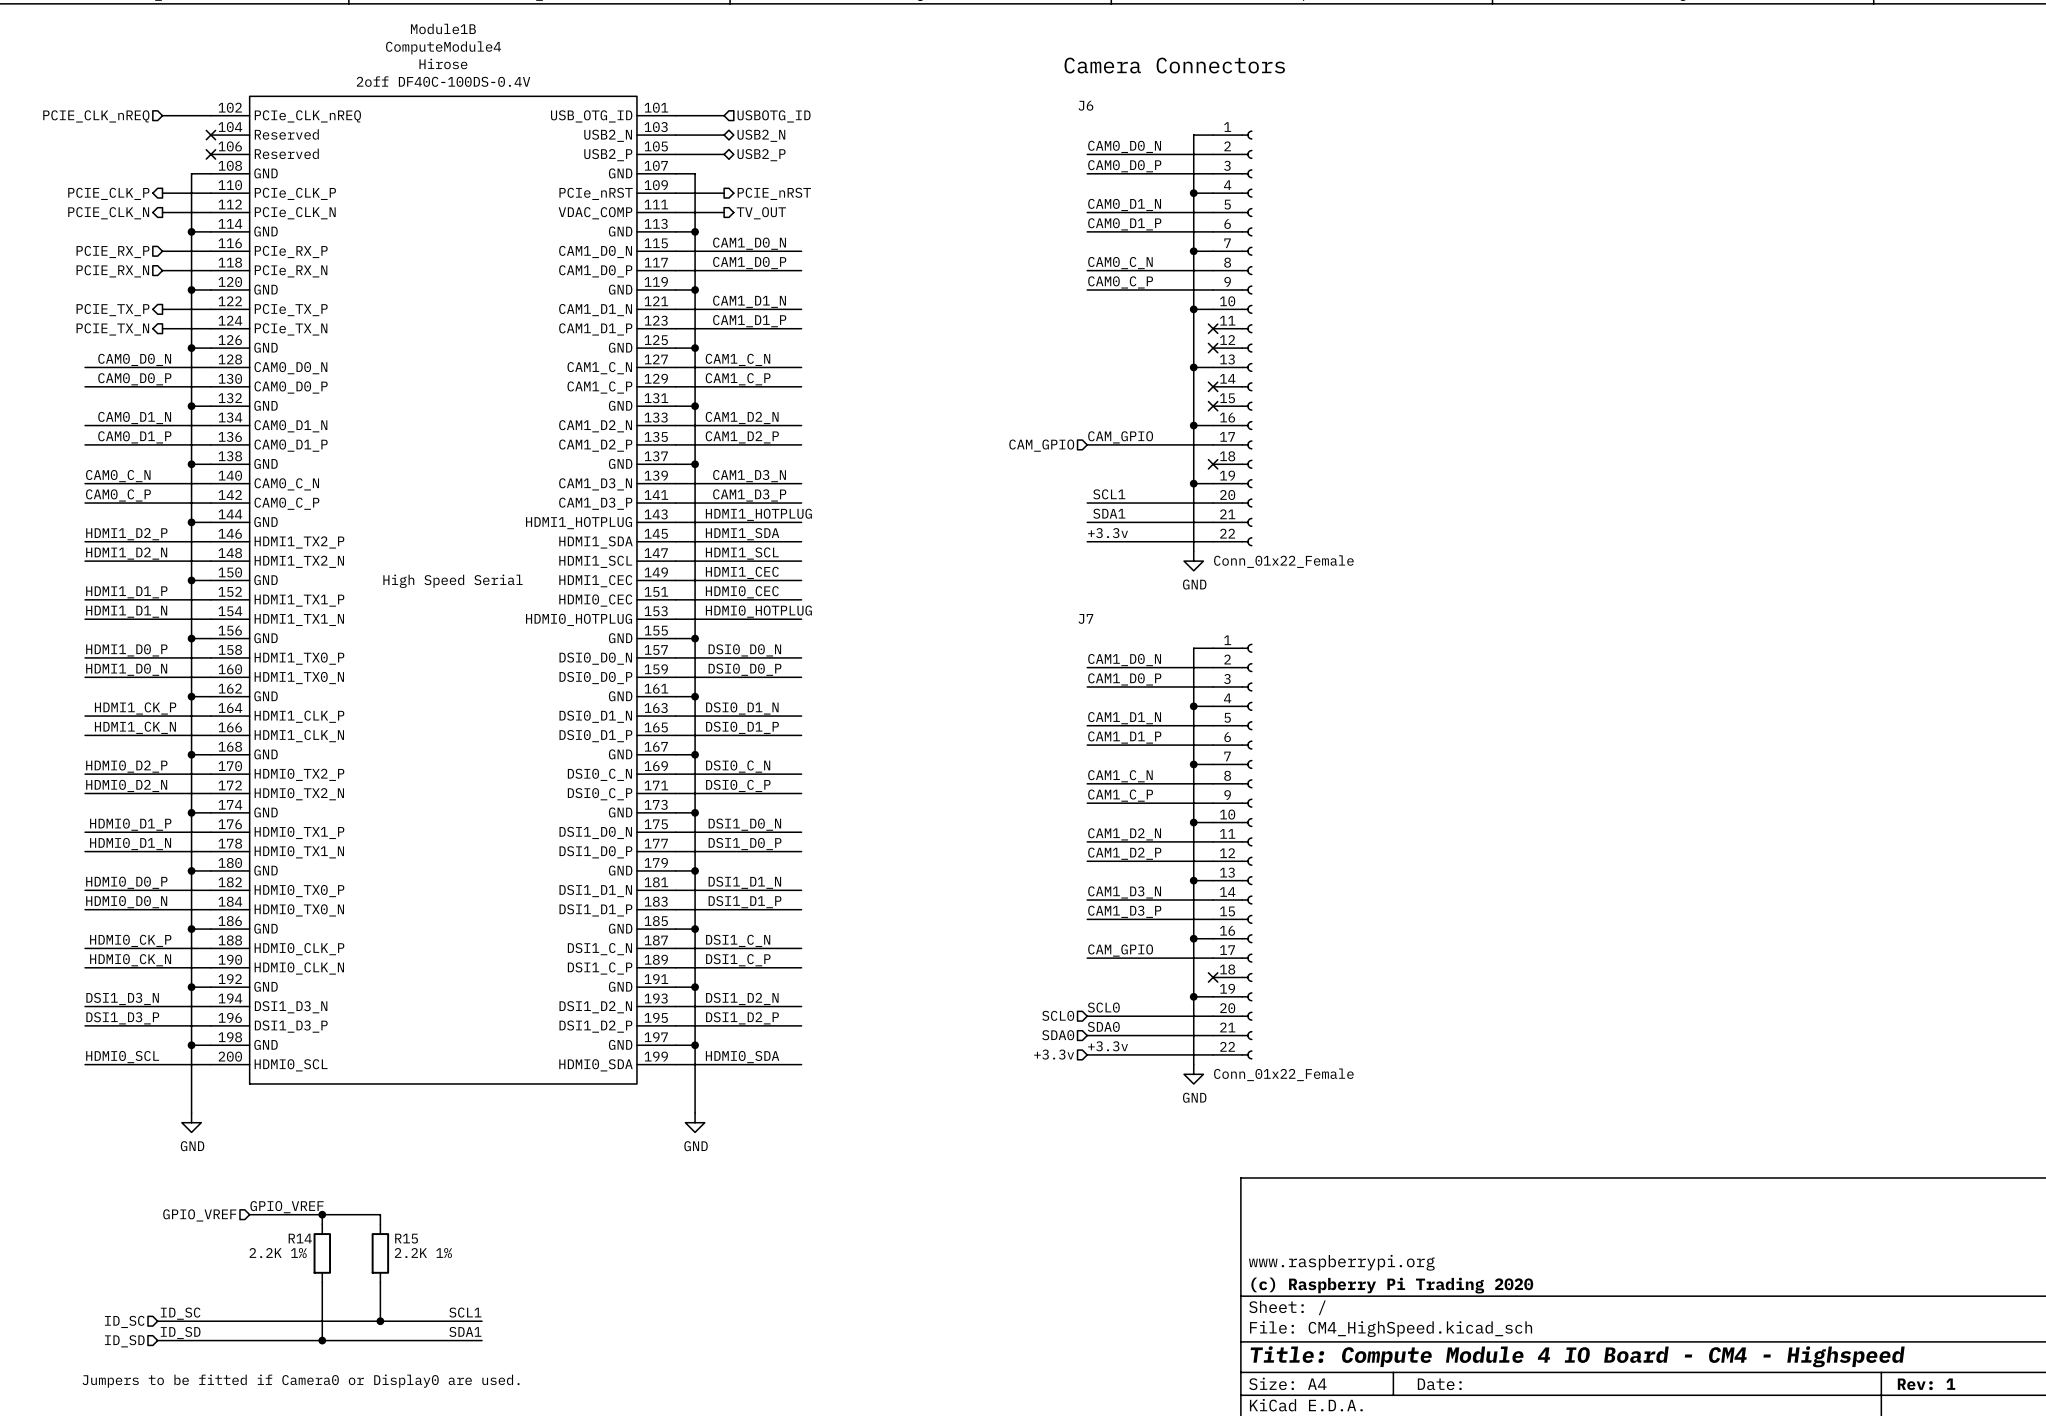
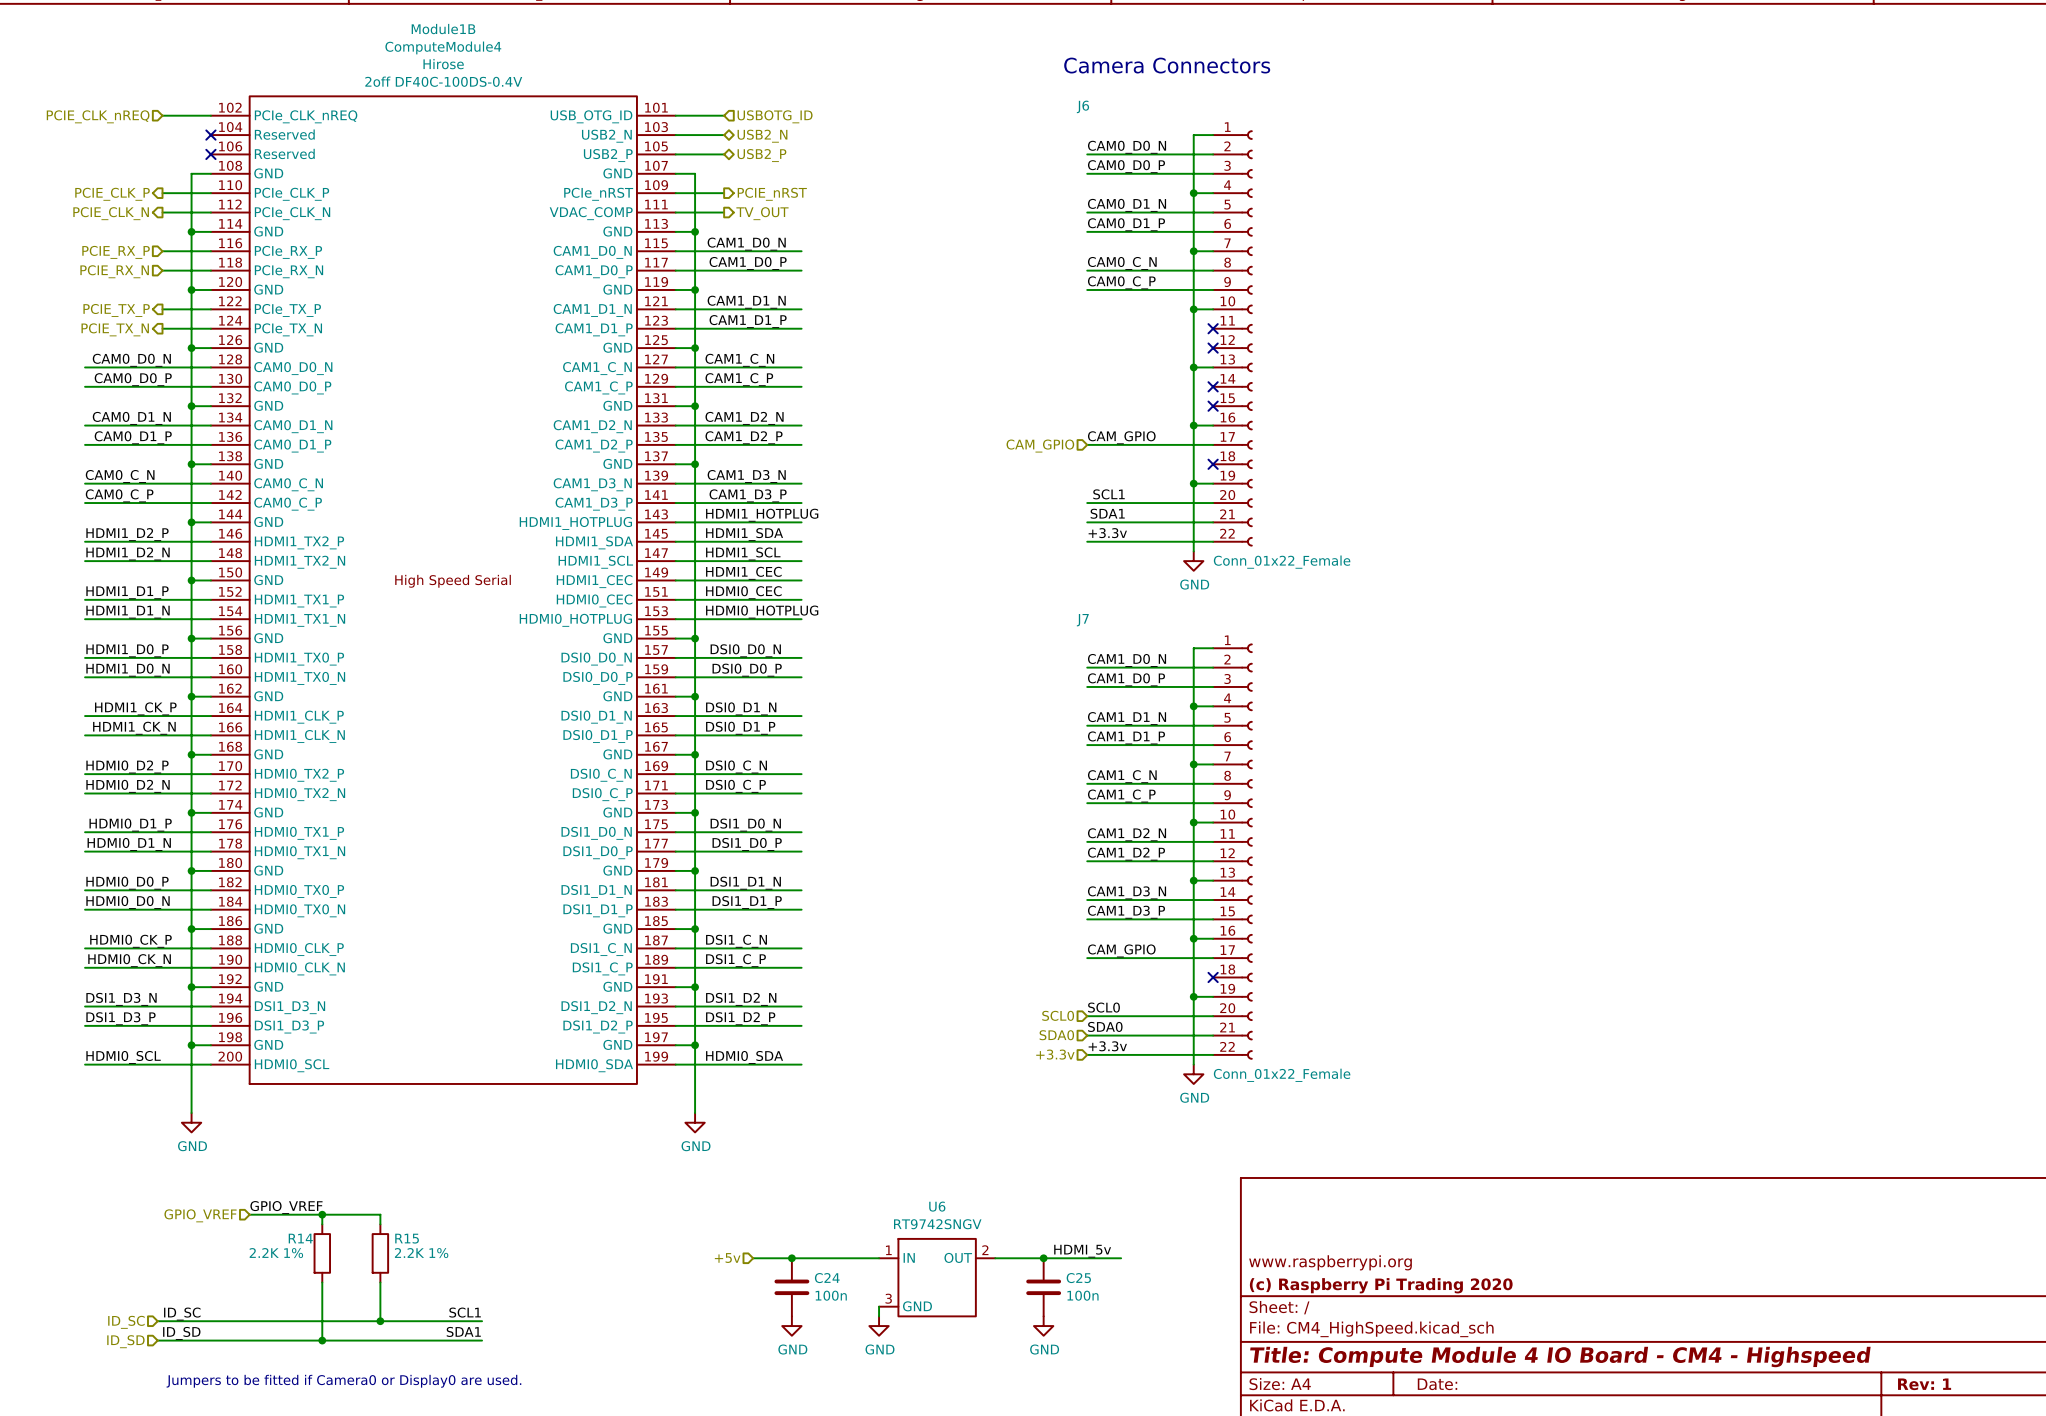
label: none -> HDMI_5v (1082, 1251)
hierarchical label: none -> +5v (727, 1258)
wire: none -> (753, 1258) (879, 1258)
junction: none -> (791, 1258)
wire: none -> (995, 1258) (1121, 1258)
junction: none -> (1043, 1258)
U6: none -> RT9742SNGV (937, 1277)
C24: none -> 100n (791, 1287)
C25: none -> 100n (1043, 1287)
wire: none -> (879, 1306) (879, 1316)
power symbol: none -> GND (791, 1326)
power symbol: none -> GND (879, 1326)
power symbol: none -> GND (1043, 1326)

